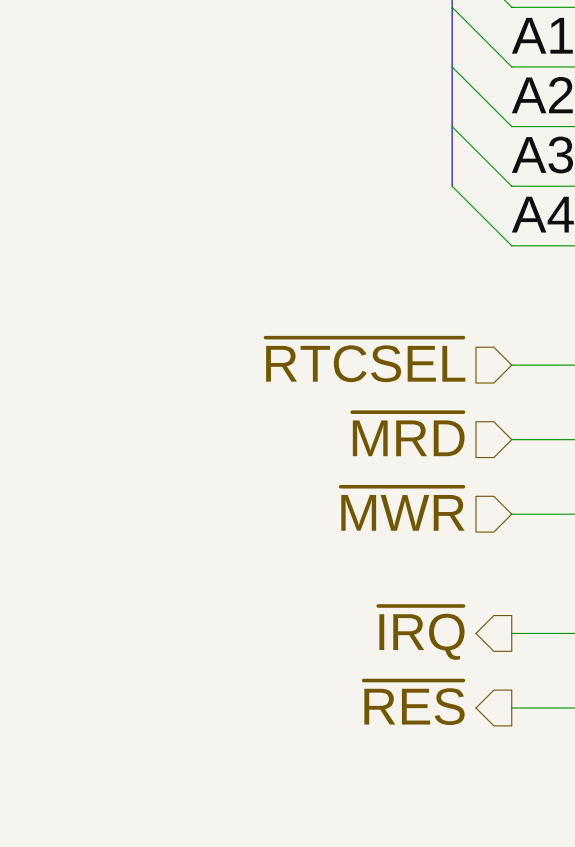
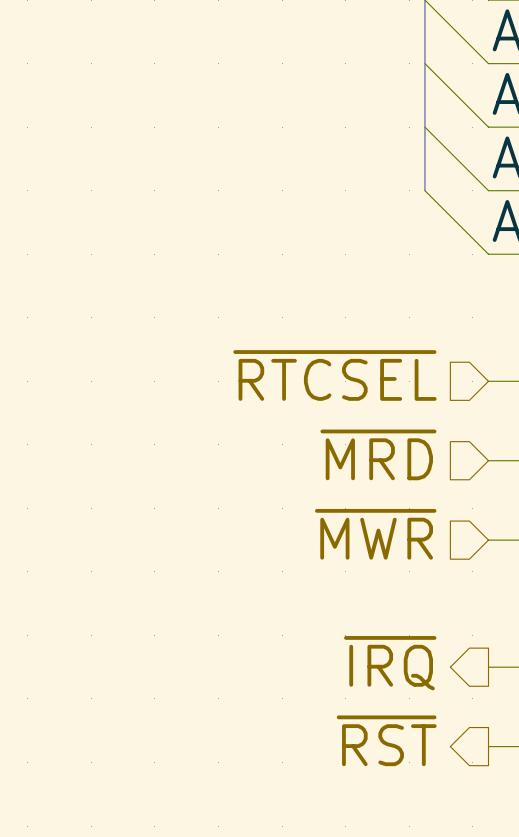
hierarchical label: ~{RES} (414, 702) -> ~{RST} (386, 740)

